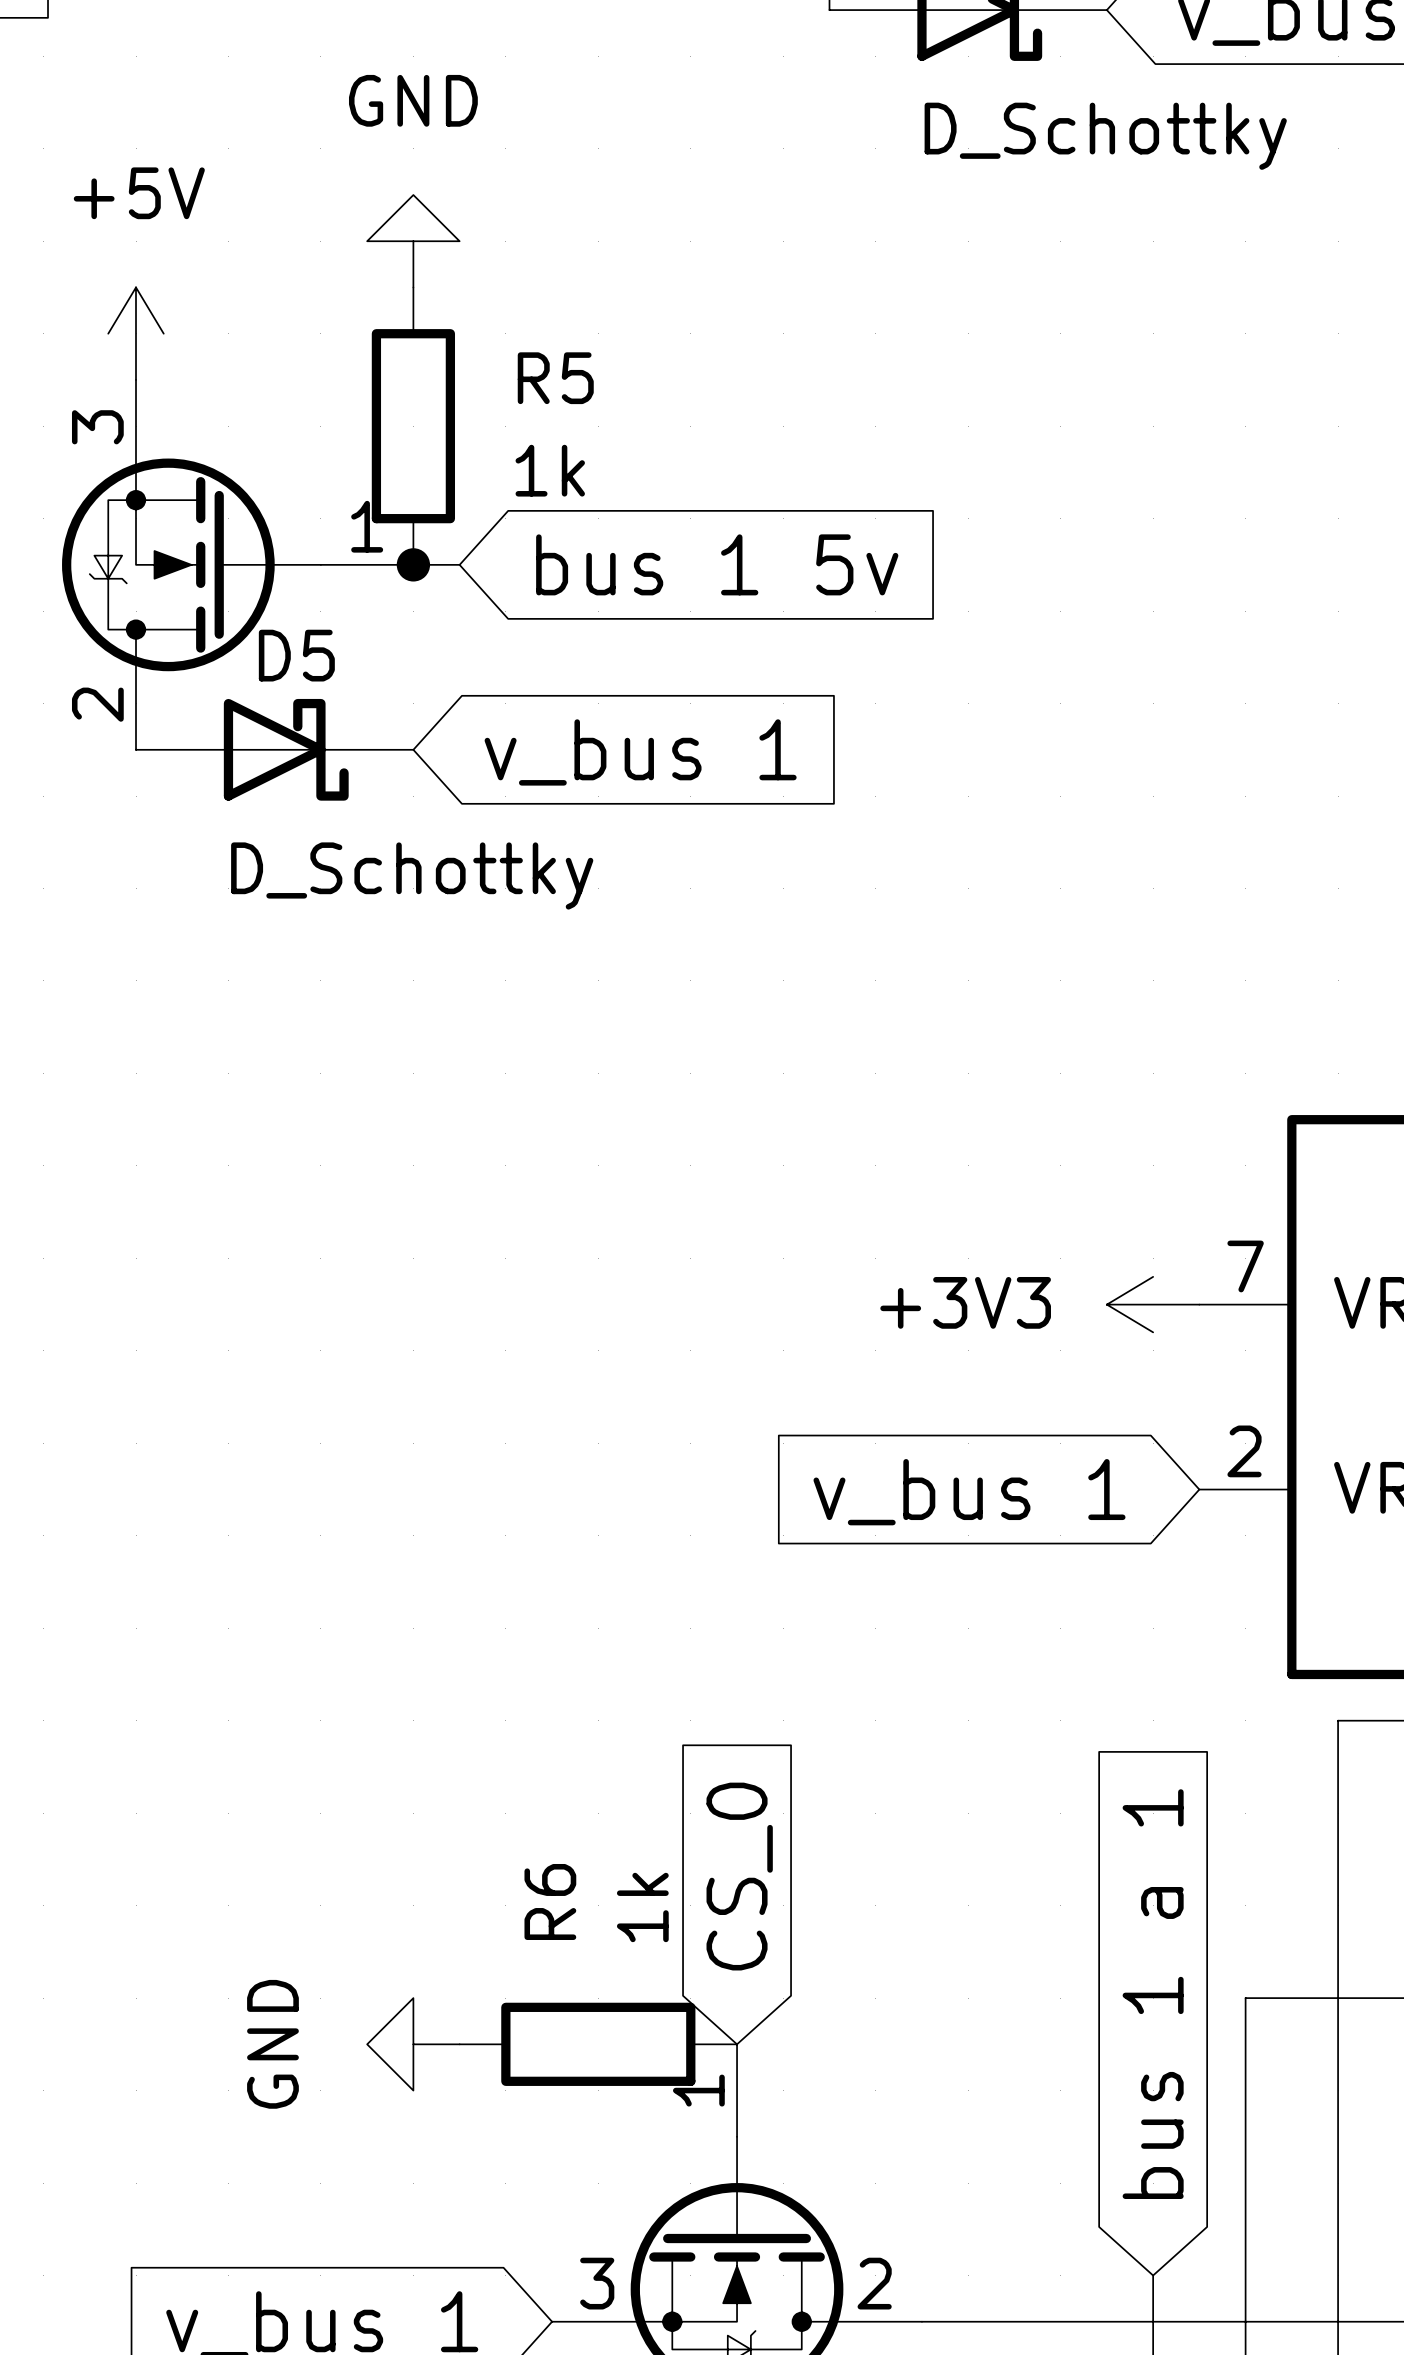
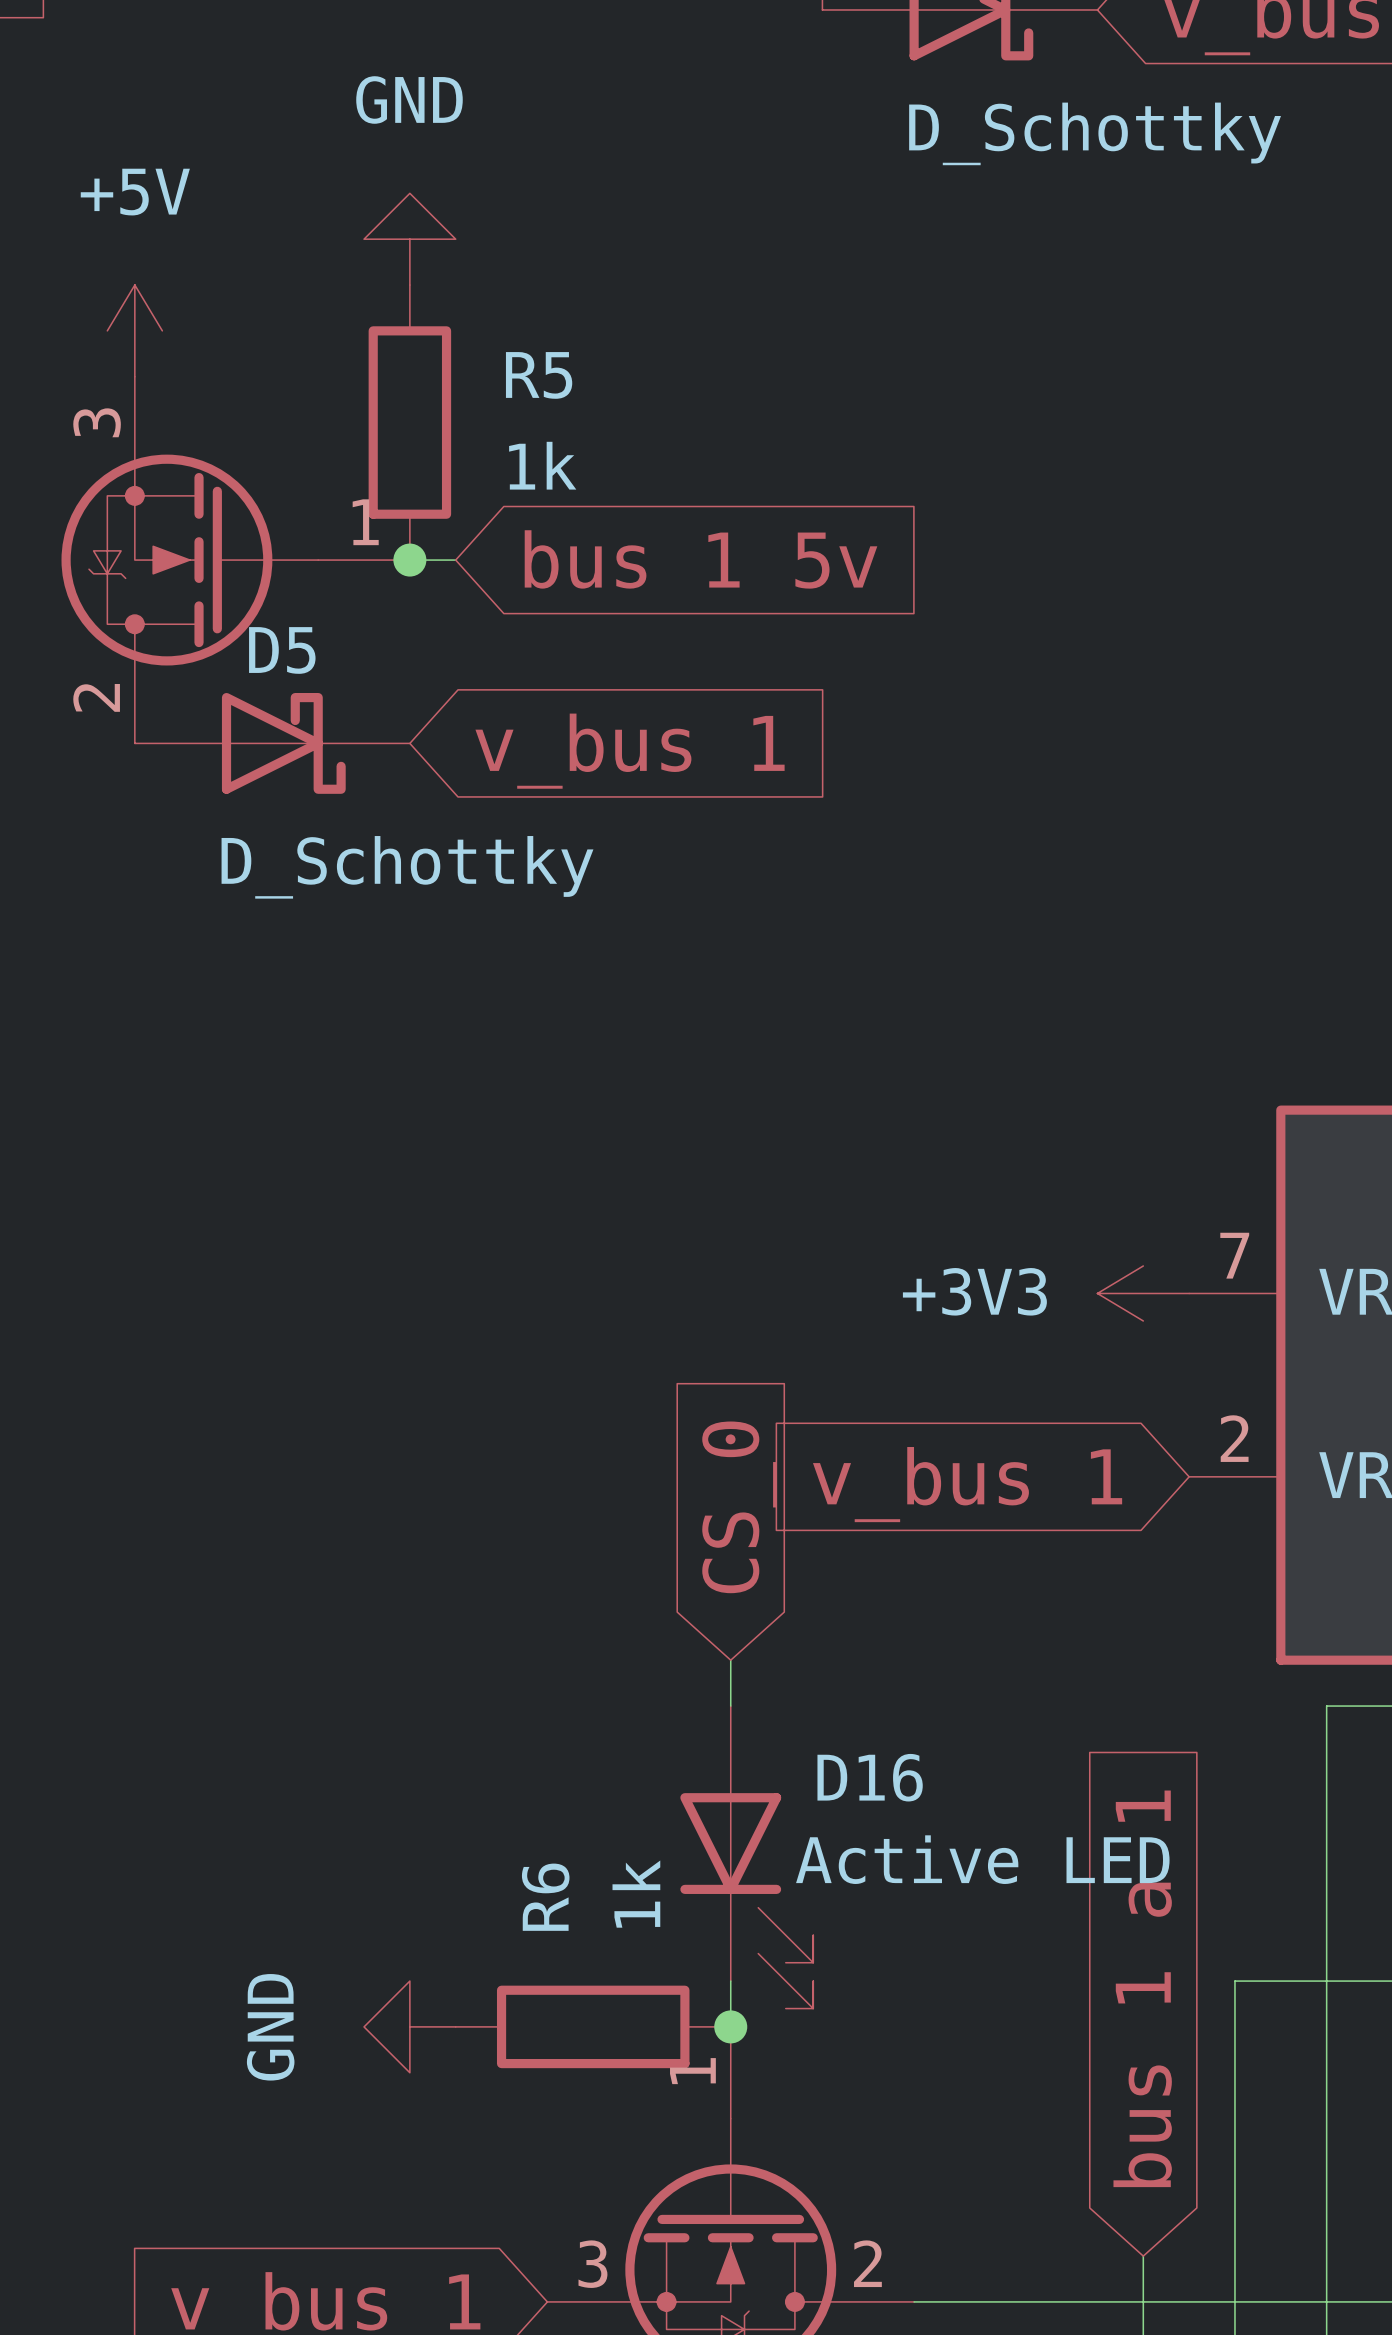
wire: none -> (730, 1660) (730, 1706)
D16: none -> Active LED (746, 1857)
global label position: CS_0 (739, 1876) -> CS_0 (739, 1507)
wire: none -> (730, 1981) (730, 2026)
junction: none -> (730, 2026)

